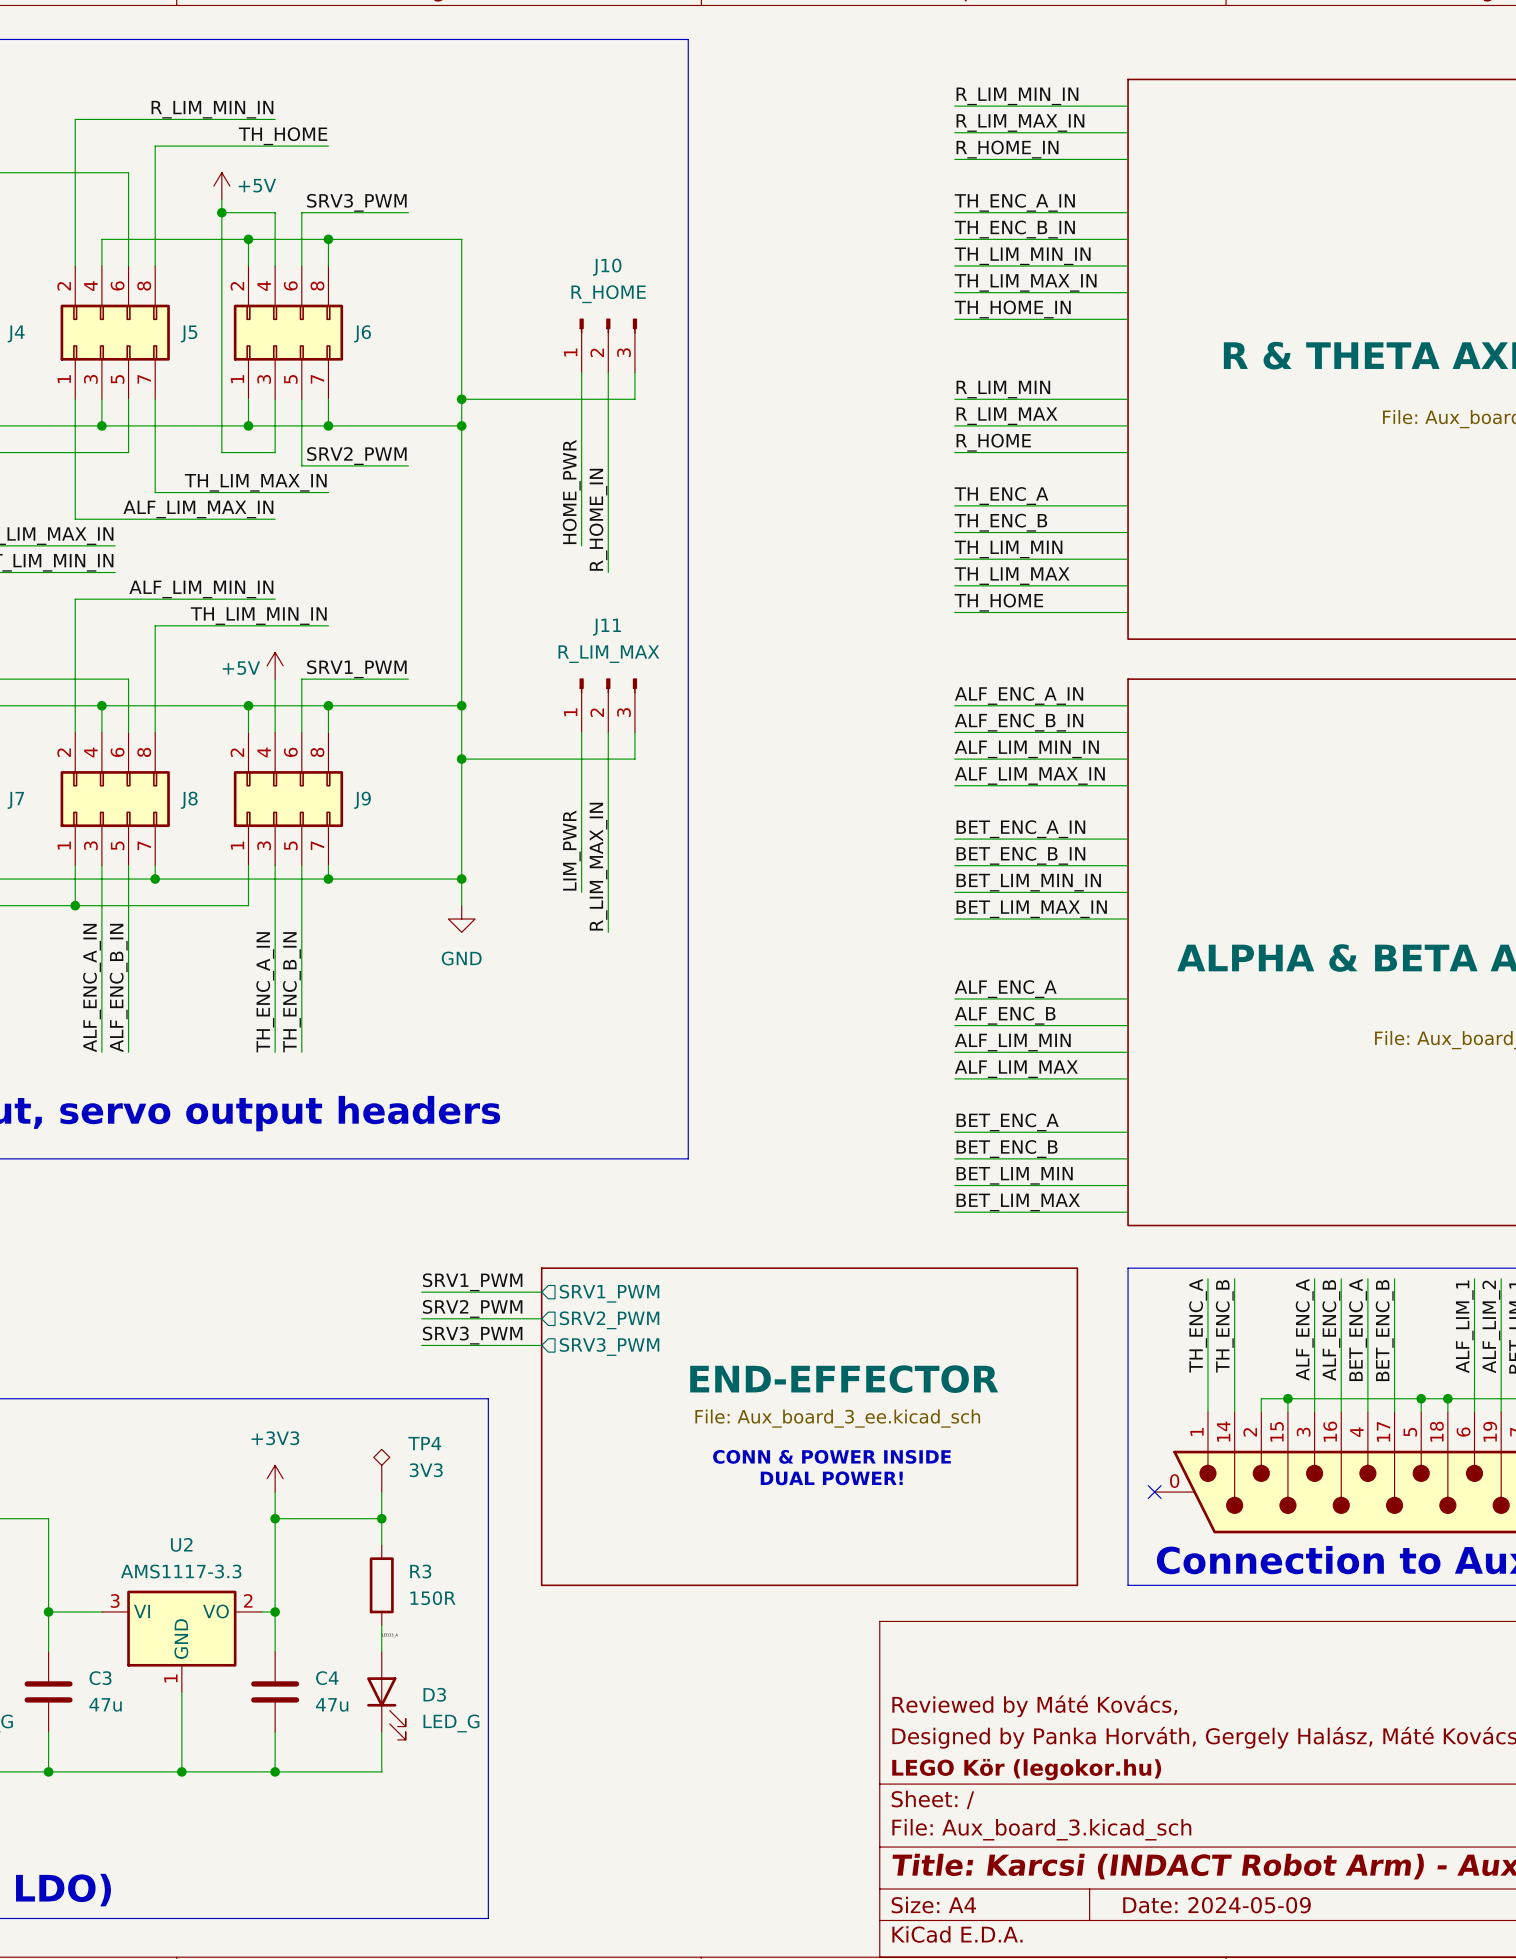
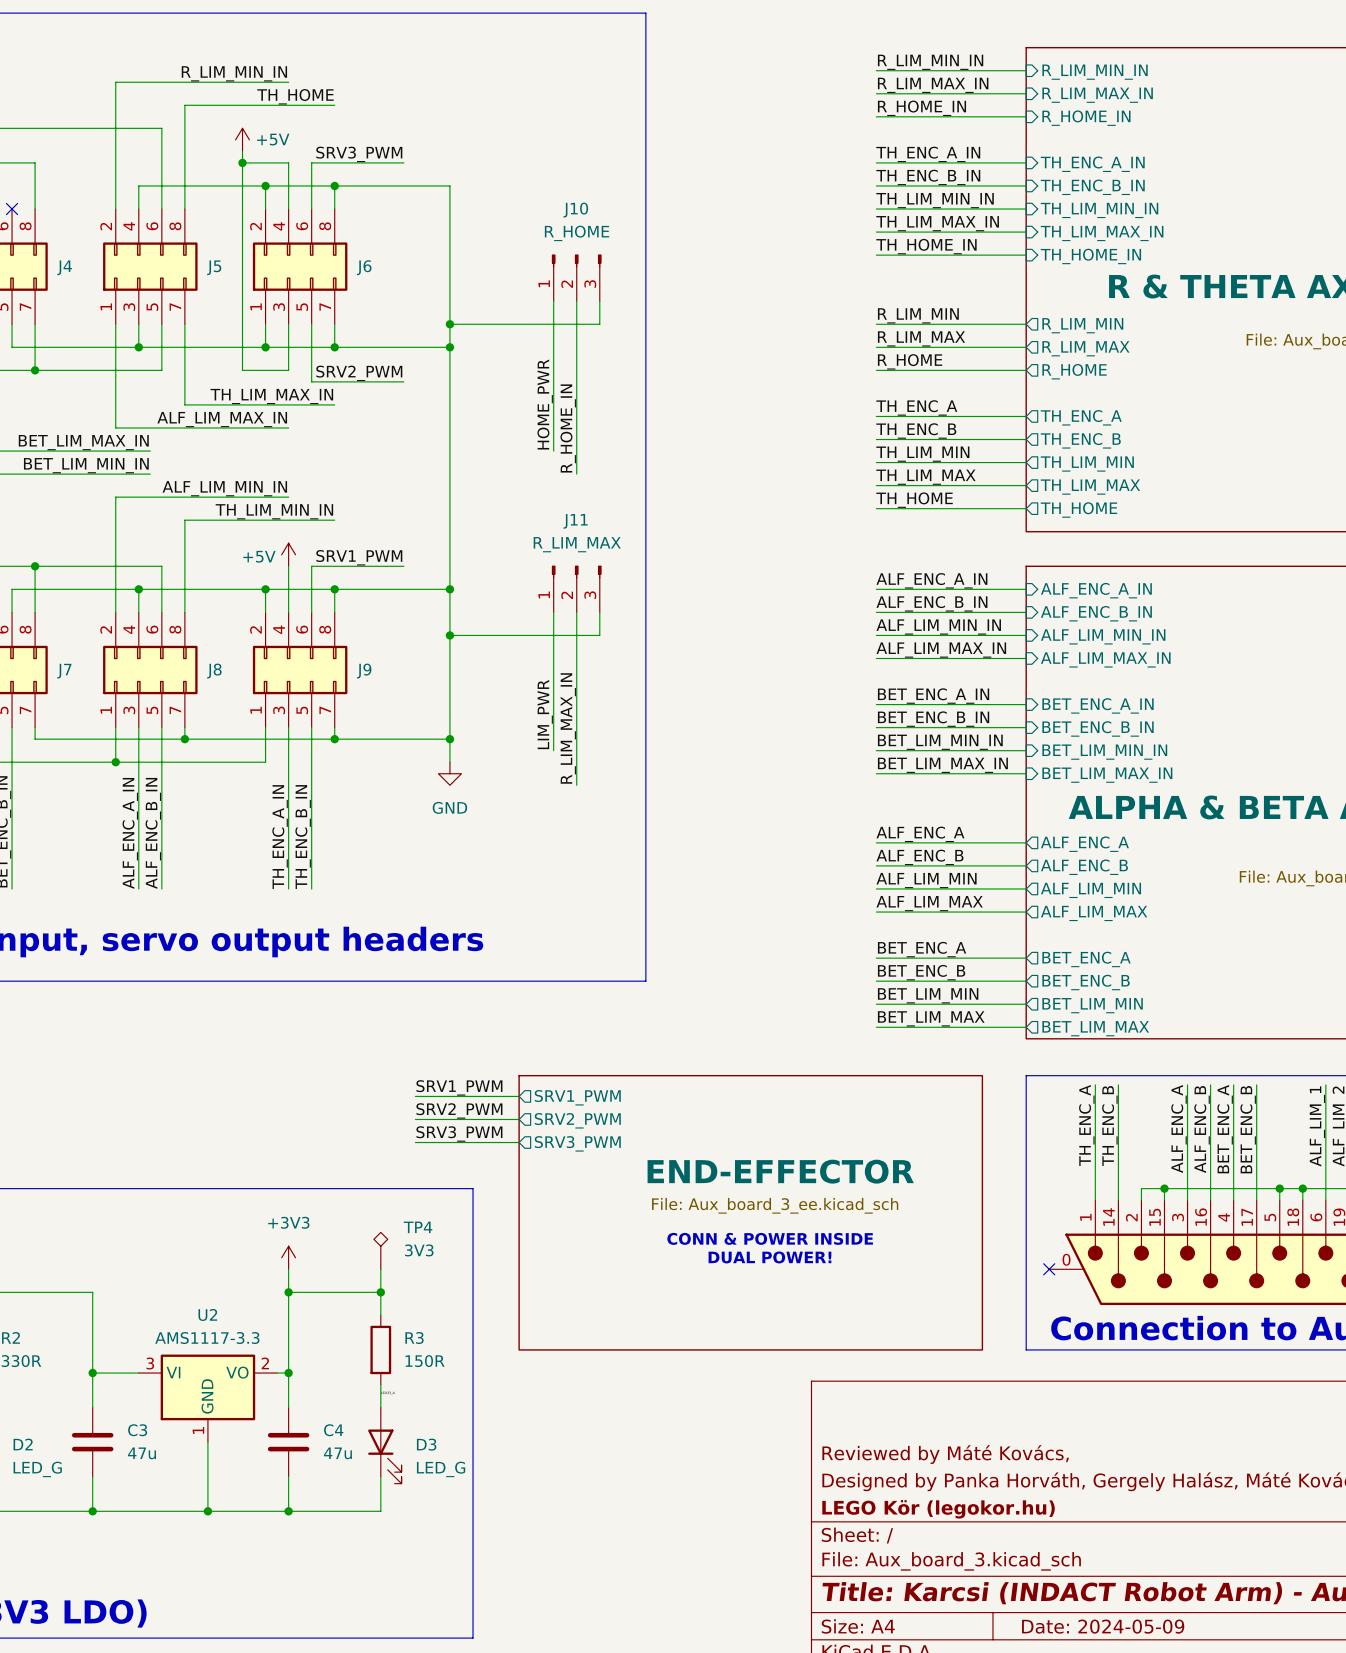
sheet pin: none -> R_LIM_MIN_IN (1095, 72)
sheet pin: none -> R_LIM_MAX_IN (1097, 95)
sheet pin: none -> R_HOME_IN (1086, 118)
sheet pin: none -> TH_ENC_A_IN (1092, 164)
sheet pin: none -> TH_ENC_B_IN (1092, 187)
sheet pin: none -> TH_LIM_MIN_IN (1099, 210)
sheet pin: none -> TH_LIM_MAX_IN (1102, 233)
sheet pin: none -> TH_HOME_IN (1090, 256)
sheet pin: none -> R_LIM_MIN (1082, 325)
sheet pin: none -> R_LIM_MAX (1085, 348)
sheet pin: none -> R_HOME (1074, 371)
sheet pin: none -> TH_ENC_A (1081, 417)
sheet pin: none -> TH_ENC_B (1080, 440)
sheet pin: none -> TH_LIM_MIN (1087, 464)
sheet pin: none -> TH_LIM_MAX (1090, 487)
sheet pin: none -> TH_HOME (1079, 509)
sheet pin: none -> ALF_ENC_A_IN (1096, 590)
sheet pin: none -> ALF_ENC_B_IN (1096, 613)
sheet pin: none -> ALF_LIM_MIN_IN (1103, 636)
sheet pin: none -> ALF_LIM_MAX_IN (1105, 659)
sheet pin: none -> BET_ENC_A_IN (1098, 705)
sheet pin: none -> BET_ENC_B_IN (1098, 728)
sheet pin: none -> BET_LIM_MIN_IN (1104, 752)
sheet pin: none -> BET_LIM_MAX_IN (1107, 775)
sheet pin: none -> ALF_ENC_A (1084, 844)
sheet pin: none -> ALF_ENC_B (1084, 867)
sheet pin: none -> ALF_LIM_MIN (1090, 890)
sheet pin: none -> ALF_LIM_MAX (1094, 913)
sheet pin: none -> BET_ENC_A (1086, 959)
sheet pin: none -> BET_ENC_B (1086, 982)
sheet pin: none -> BET_LIM_MIN (1092, 1005)
sheet pin: none -> BET_LIM_MAX (1095, 1028)

